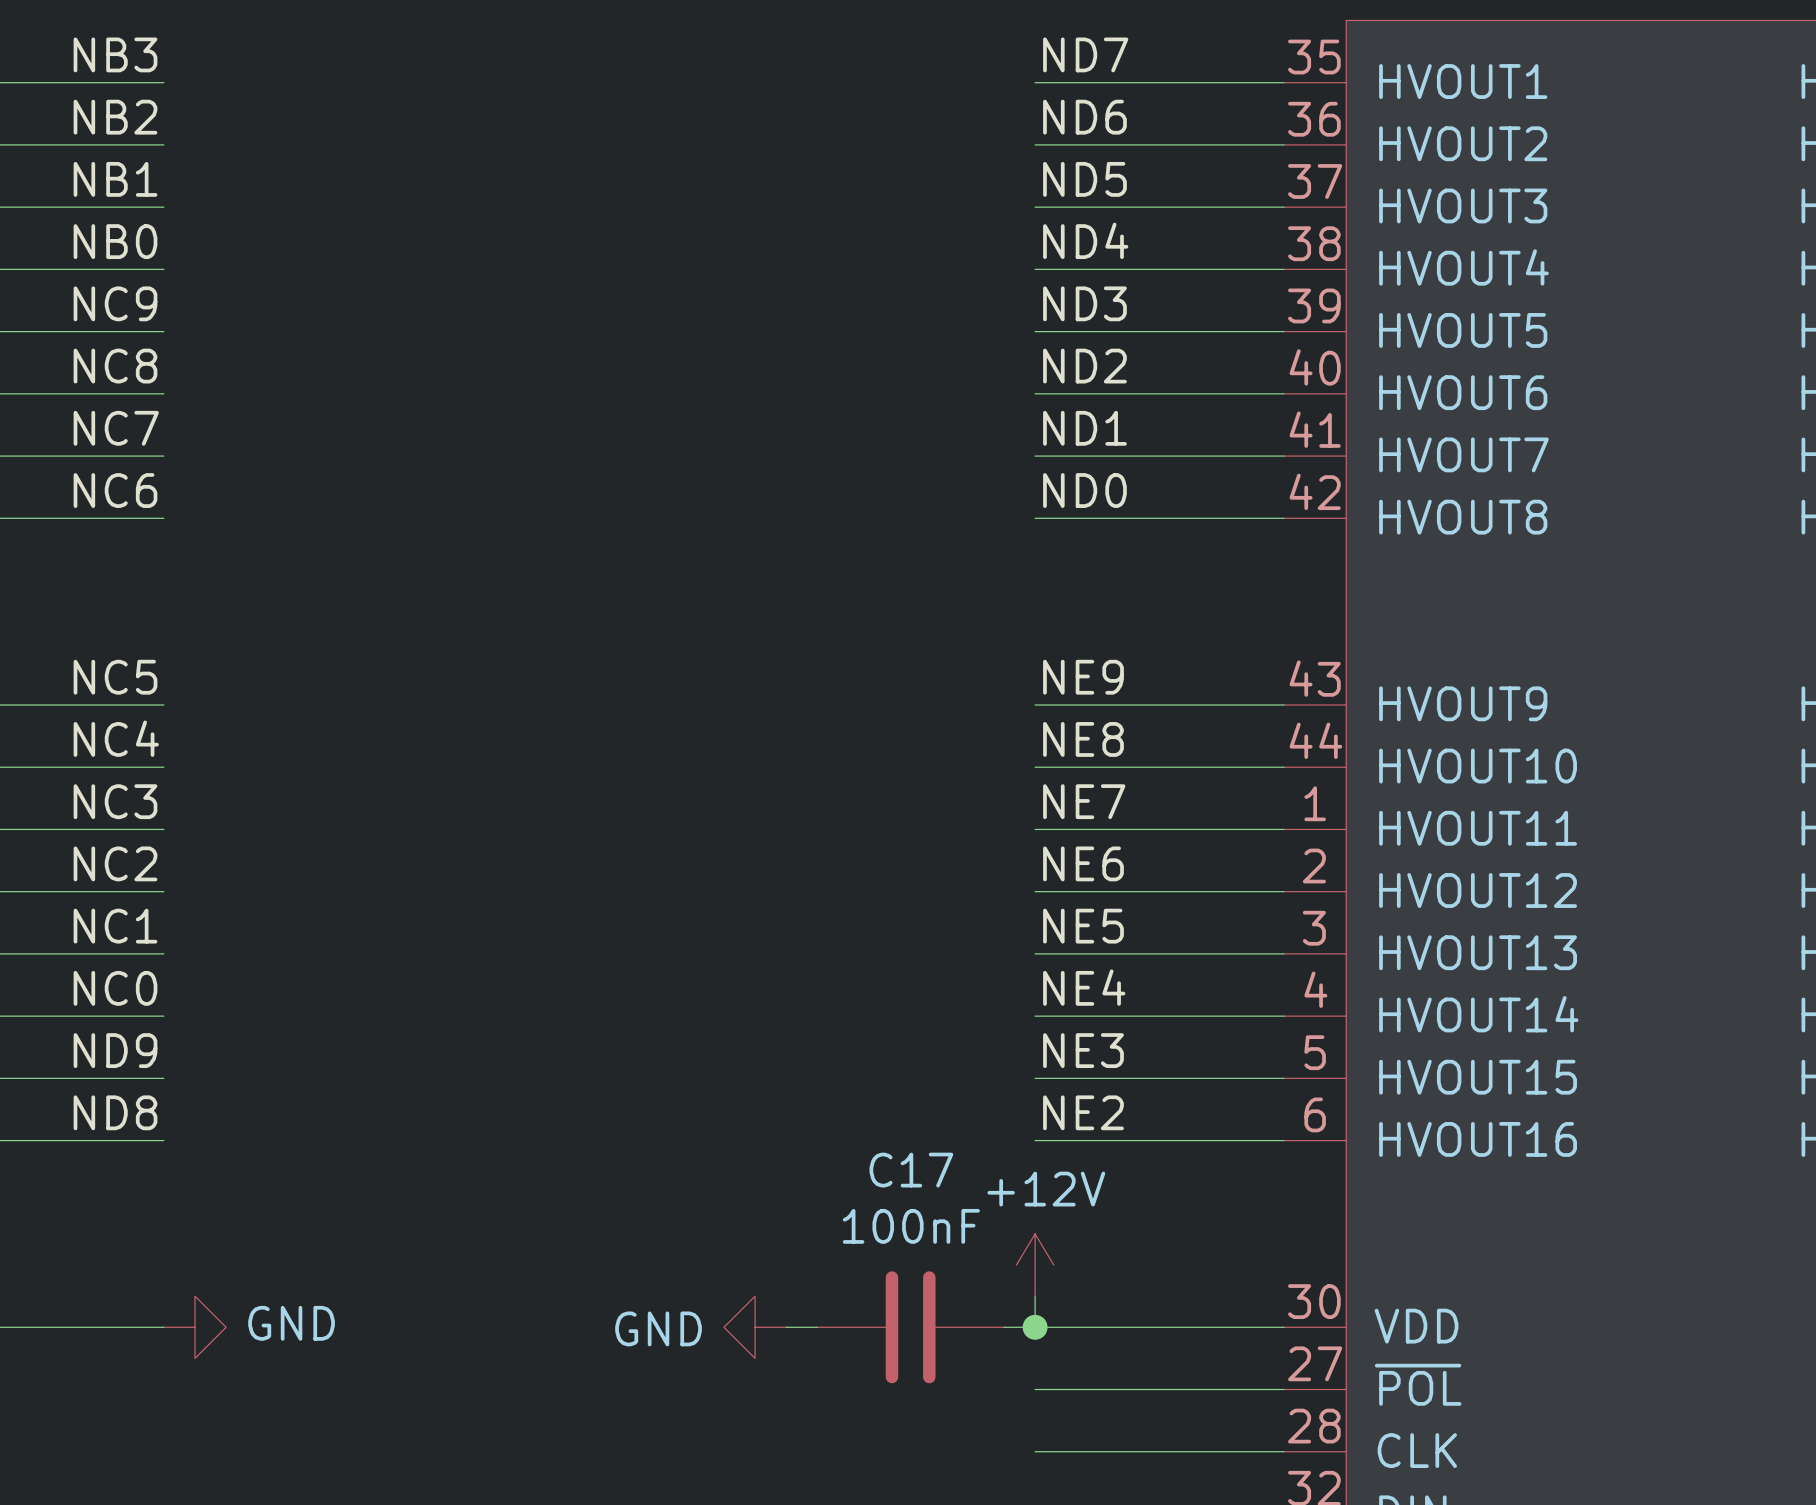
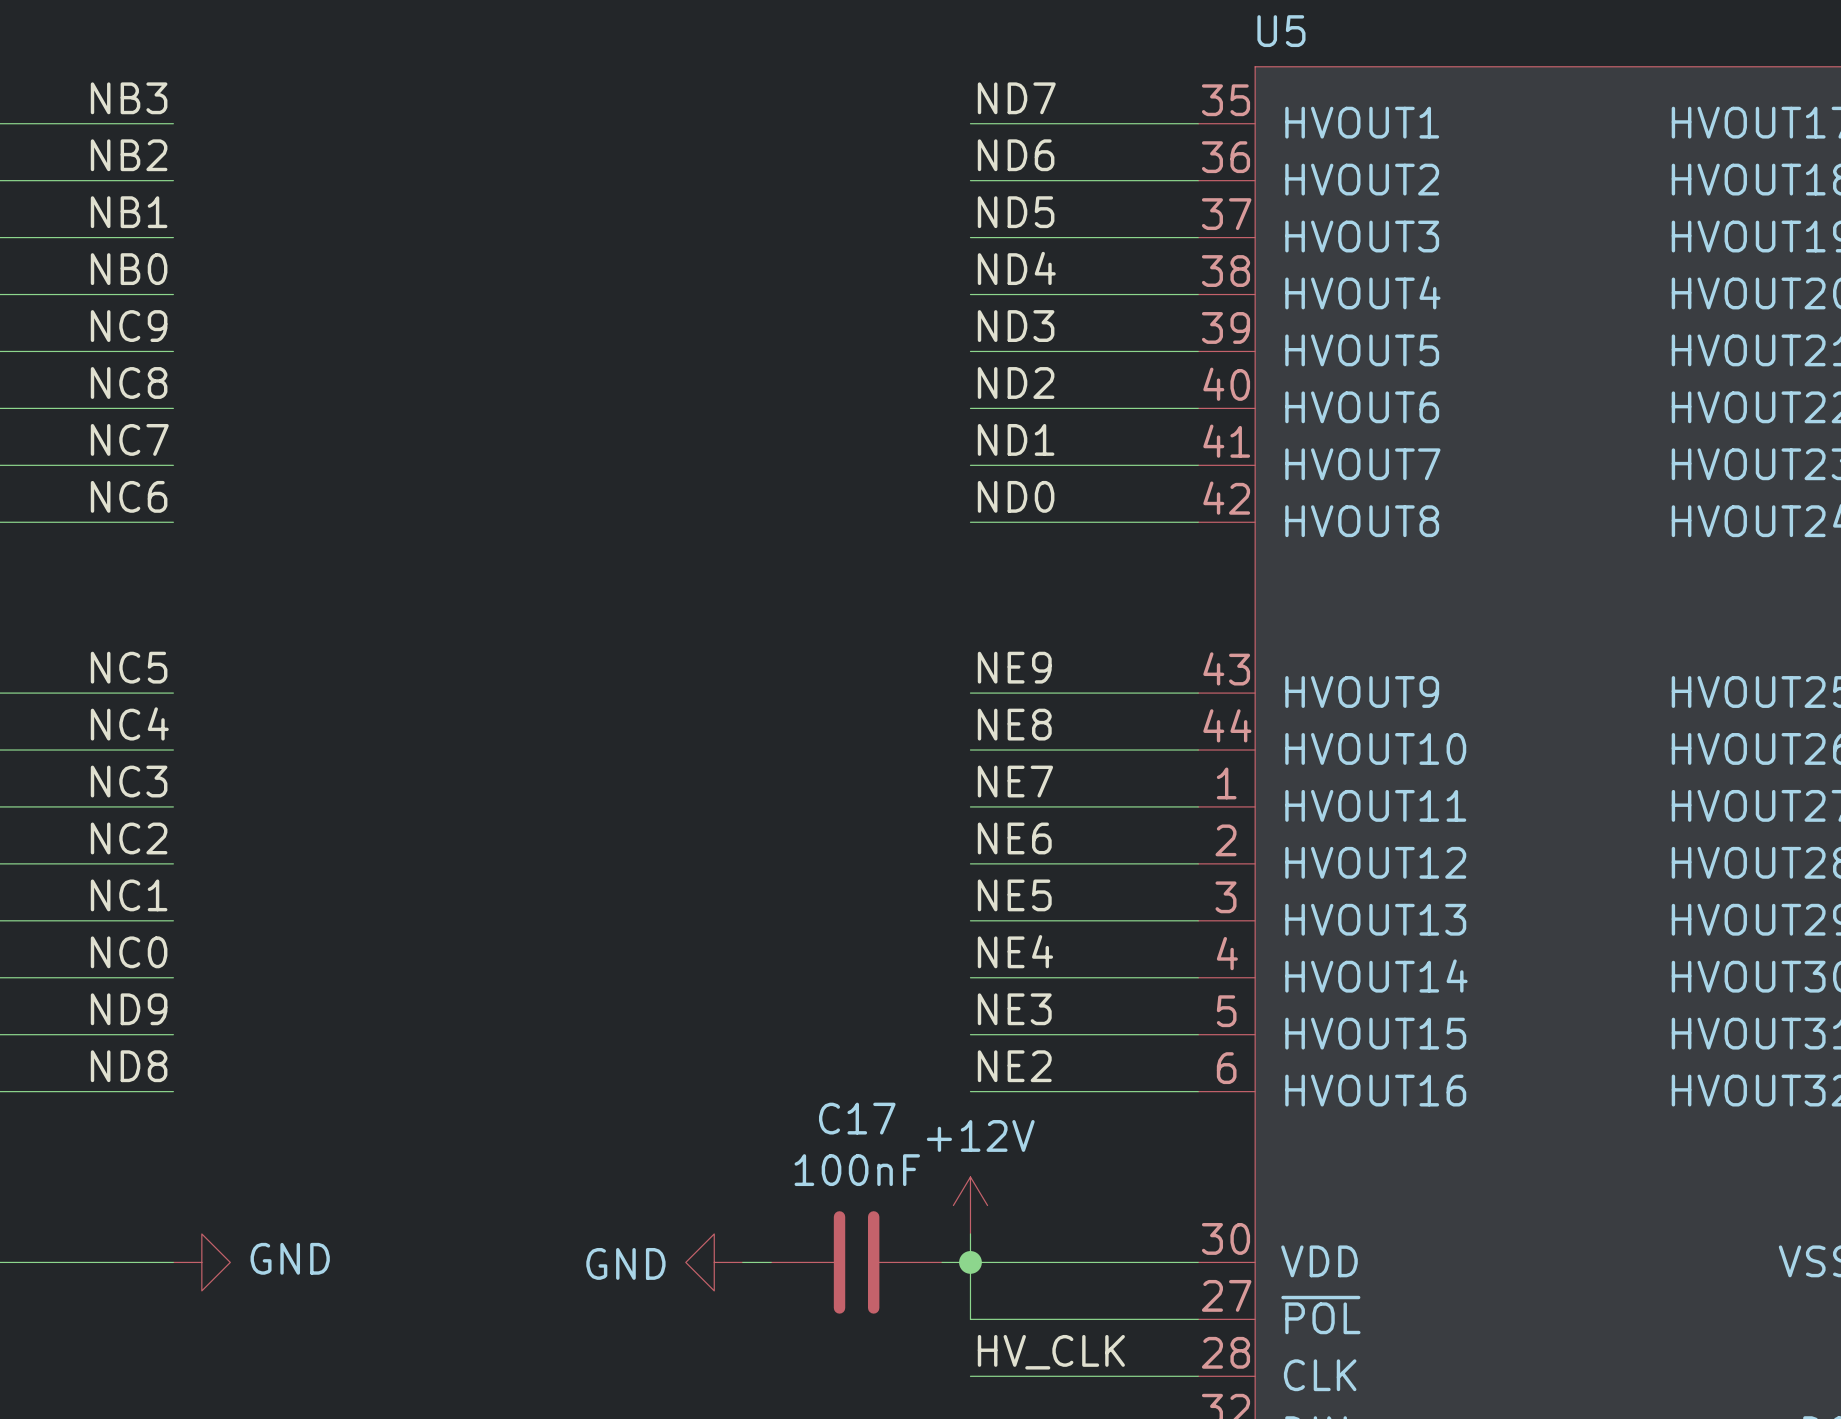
wire: none -> (970, 1262) (970, 1319)
label: none -> HV_CLK (1051, 1352)

